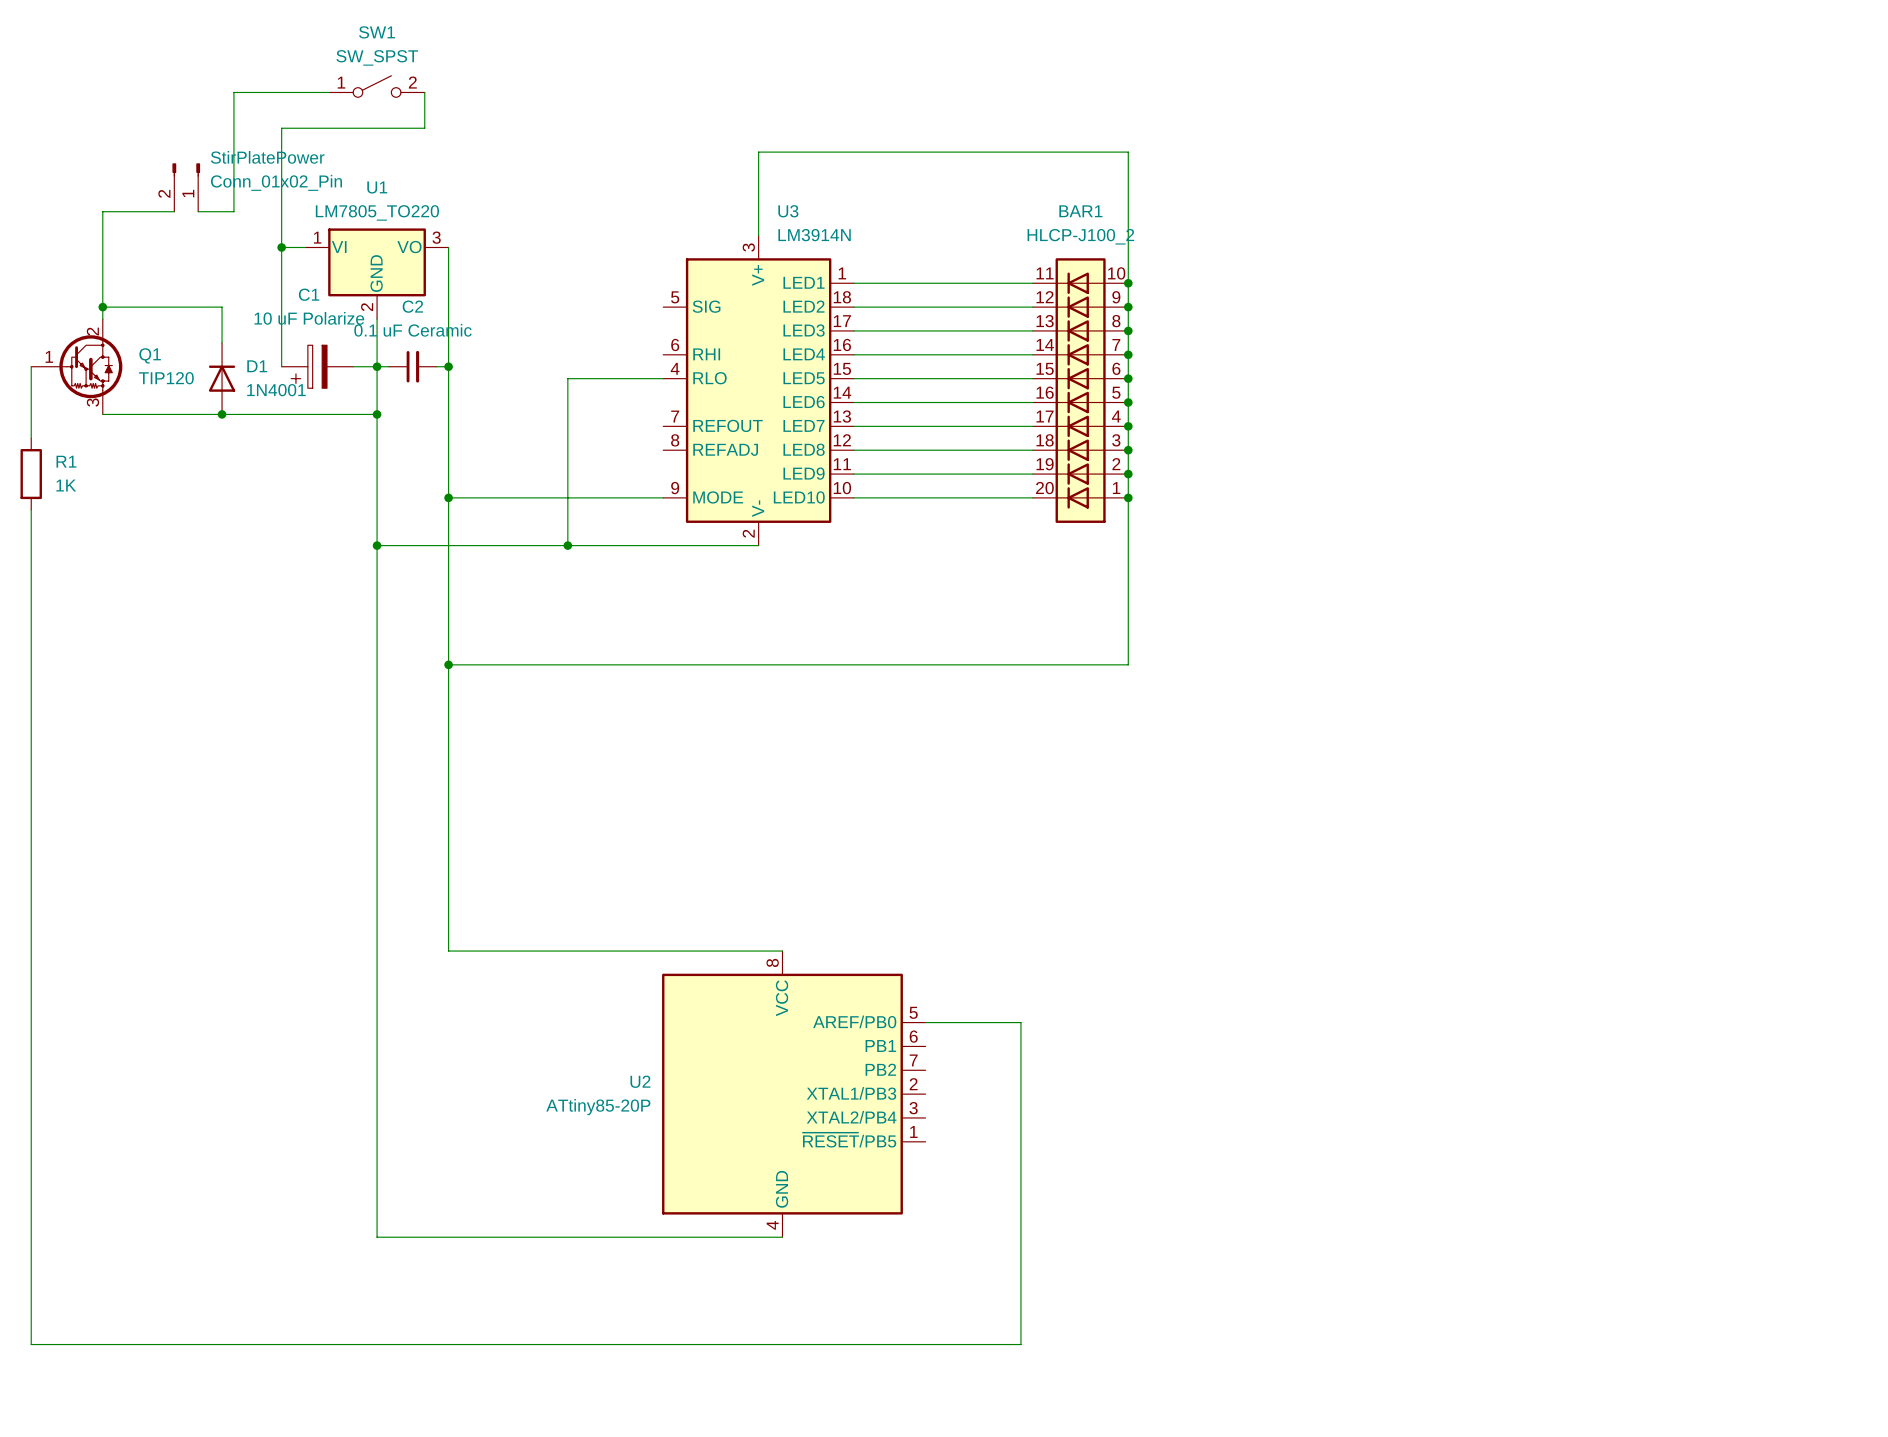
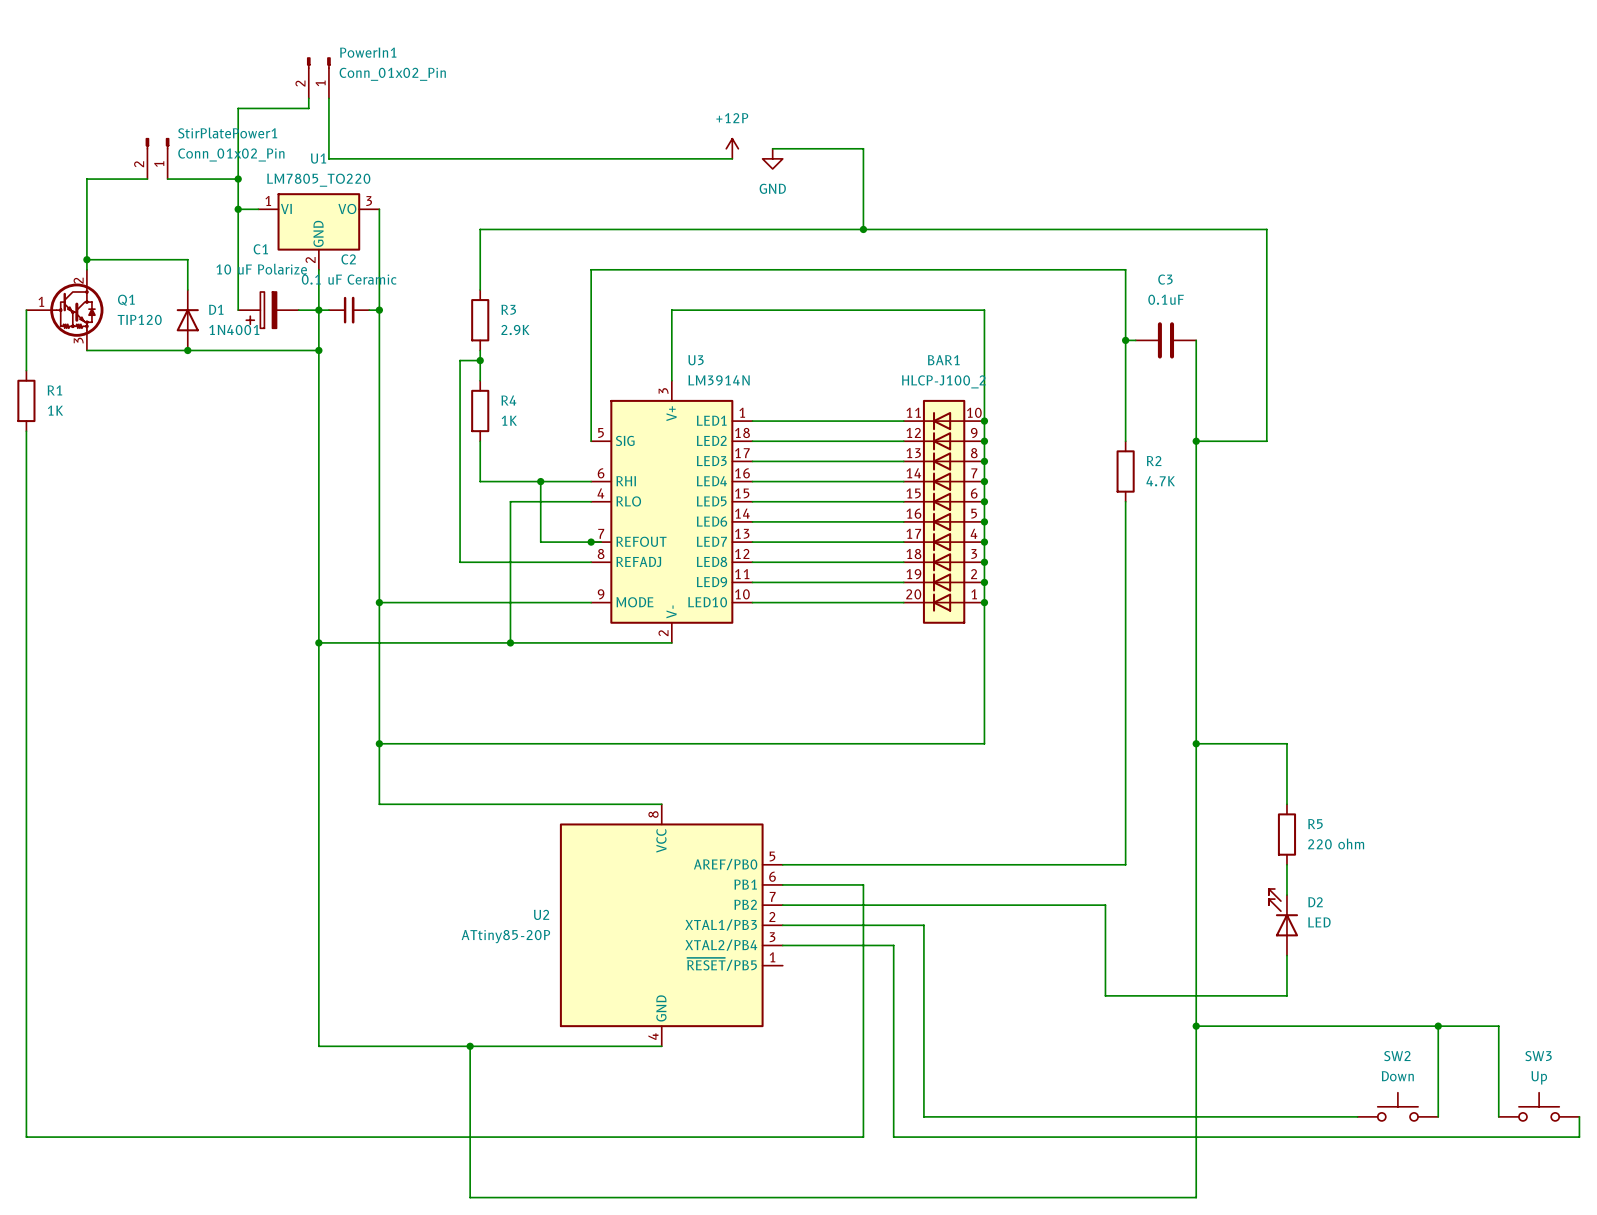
SW1: SW_SPST (377, 86) -> none
wire: (329, 92) (233, 92) (233, 211) -> (238, 179) (197, 179)
PowerIn1: none -> Conn_01x02_Pin (318, 77)
wire: (424, 92) (424, 128) (365, 128) -> (308, 98) (308, 108)
wire: none -> (328, 98) (328, 158) (732, 158)
StirPlatePower name: StirPlatePower (267, 157) -> StirPlatePower1 (227, 133)
power symbol: none -> +12P (732, 148)
wire: none -> (772, 148) (863, 148) (863, 229)
power symbol: none -> GND (772, 158)
junction: none -> (238, 179)
wire: (758, 235) (758, 152) (1128, 152) (1128, 664) (1068, 664) -> none
junction: none -> (863, 229)
wire: (854, 283) (1032, 283) -> none
junction: (1128, 283) -> none
wire: (854, 307) (1032, 307) -> (752, 441) (903, 441)
junction: (1128, 307) -> none
wire: (854, 330) (1032, 330) -> (752, 461) (903, 461)
junction: (1128, 330) -> none
wire: none -> (480, 289) (480, 229) (1266, 229) (1266, 441) (1196, 441)
wire: (854, 354) (1032, 354) -> (752, 481) (903, 481)
junction: (1128, 354) -> none
R3: none -> 2.9K (480, 320)
wire: (663, 378) (567, 378) (567, 414) -> none
wire: (854, 378) (1032, 378) -> (752, 501) (903, 501)
junction: (1128, 378) -> none
U3 position: (758, 390) -> (671, 511)
BAR1 position: (1080, 390) -> (944, 511)
wire: (854, 402) (1032, 402) -> (752, 521) (903, 521)
junction: (1128, 402) -> none
wire: none -> (1125, 340) (1135, 340)
junction: none -> (1125, 340)
C3: none -> 0.1uF (1165, 340)
wire: none -> (1196, 340) (1196, 1197) (470, 1197) (470, 1046)
junction: none -> (480, 360)
wire: (854, 426) (1032, 426) -> (752, 542) (903, 542)
junction: (1128, 426) -> none
wire: (567, 450) (567, 521) -> none
wire: none -> (671, 380) (671, 310) (984, 310) (984, 743) (379, 743)
wire: (854, 450) (1032, 450) -> none
junction: (1128, 450) -> none
wire: (854, 474) (1032, 474) -> (752, 582) (903, 582)
junction: (1128, 474) -> none
R4: none -> 1K (480, 410)
wire: (448, 497) (663, 497) -> none
junction: (448, 497) -> none
junction: (1128, 497) -> none
junction: none -> (984, 421)
wire: none -> (591, 441) (591, 269) (1125, 269) (1125, 441)
junction: none -> (984, 441)
junction: none -> (1196, 441)
wire: (377, 545) (758, 545) -> none
junction: (377, 545) -> none
wire: none -> (480, 461) (480, 481) (591, 481)
junction: (567, 545) -> none
junction: none -> (984, 461)
R2: none -> 4.7K (1125, 471)
wire: none -> (540, 481) (540, 542) (601, 542)
junction: none -> (540, 481)
junction: none -> (984, 481)
wire: none -> (591, 501) (510, 501) (510, 642)
junction: none -> (984, 501)
wire: none -> (1125, 501) (1125, 864) (863, 864)
junction: none -> (984, 521)
junction: none -> (591, 542)
junction: none -> (984, 542)
wire: (448, 664) (543, 664) -> (480, 360) (460, 360) (460, 562)
junction position: (448, 664) -> (379, 602)
junction: none -> (984, 562)
junction: none -> (984, 582)
wire: none -> (379, 602) (591, 602)
wire: none -> (752, 602) (903, 602)
junction: none -> (984, 602)
wire: none -> (318, 642) (671, 642)
junction: none -> (318, 642)
junction: none -> (510, 642)
junction: none -> (379, 743)
wire: none -> (1196, 743) (1286, 743) (1286, 804)
junction: none -> (1196, 743)
R5: none -> 220 ohm (1286, 834)
wire: (1020, 1022) (1020, 1046) -> (782, 884) (863, 884)
wire: none -> (1286, 864) (1286, 895)
wire: none -> (782, 905) (1105, 905) (1105, 995) (1286, 995) (1286, 955)
D2: none -> LED (1283, 922)
wire: none -> (782, 925) (923, 925) (923, 1116) (1357, 1116)
wire: none -> (782, 945) (893, 945) (893, 1137) (1579, 1137) (1579, 1116)
wire: none -> (1196, 1026) (1498, 1026) (1498, 1116)
junction: none -> (1196, 1026)
wire: none -> (1438, 1026) (1438, 1116)
junction: none -> (1438, 1026)
junction: none -> (470, 1046)
SW2: none -> Down (1397, 1106)
SW3: none -> Up (1539, 1106)

